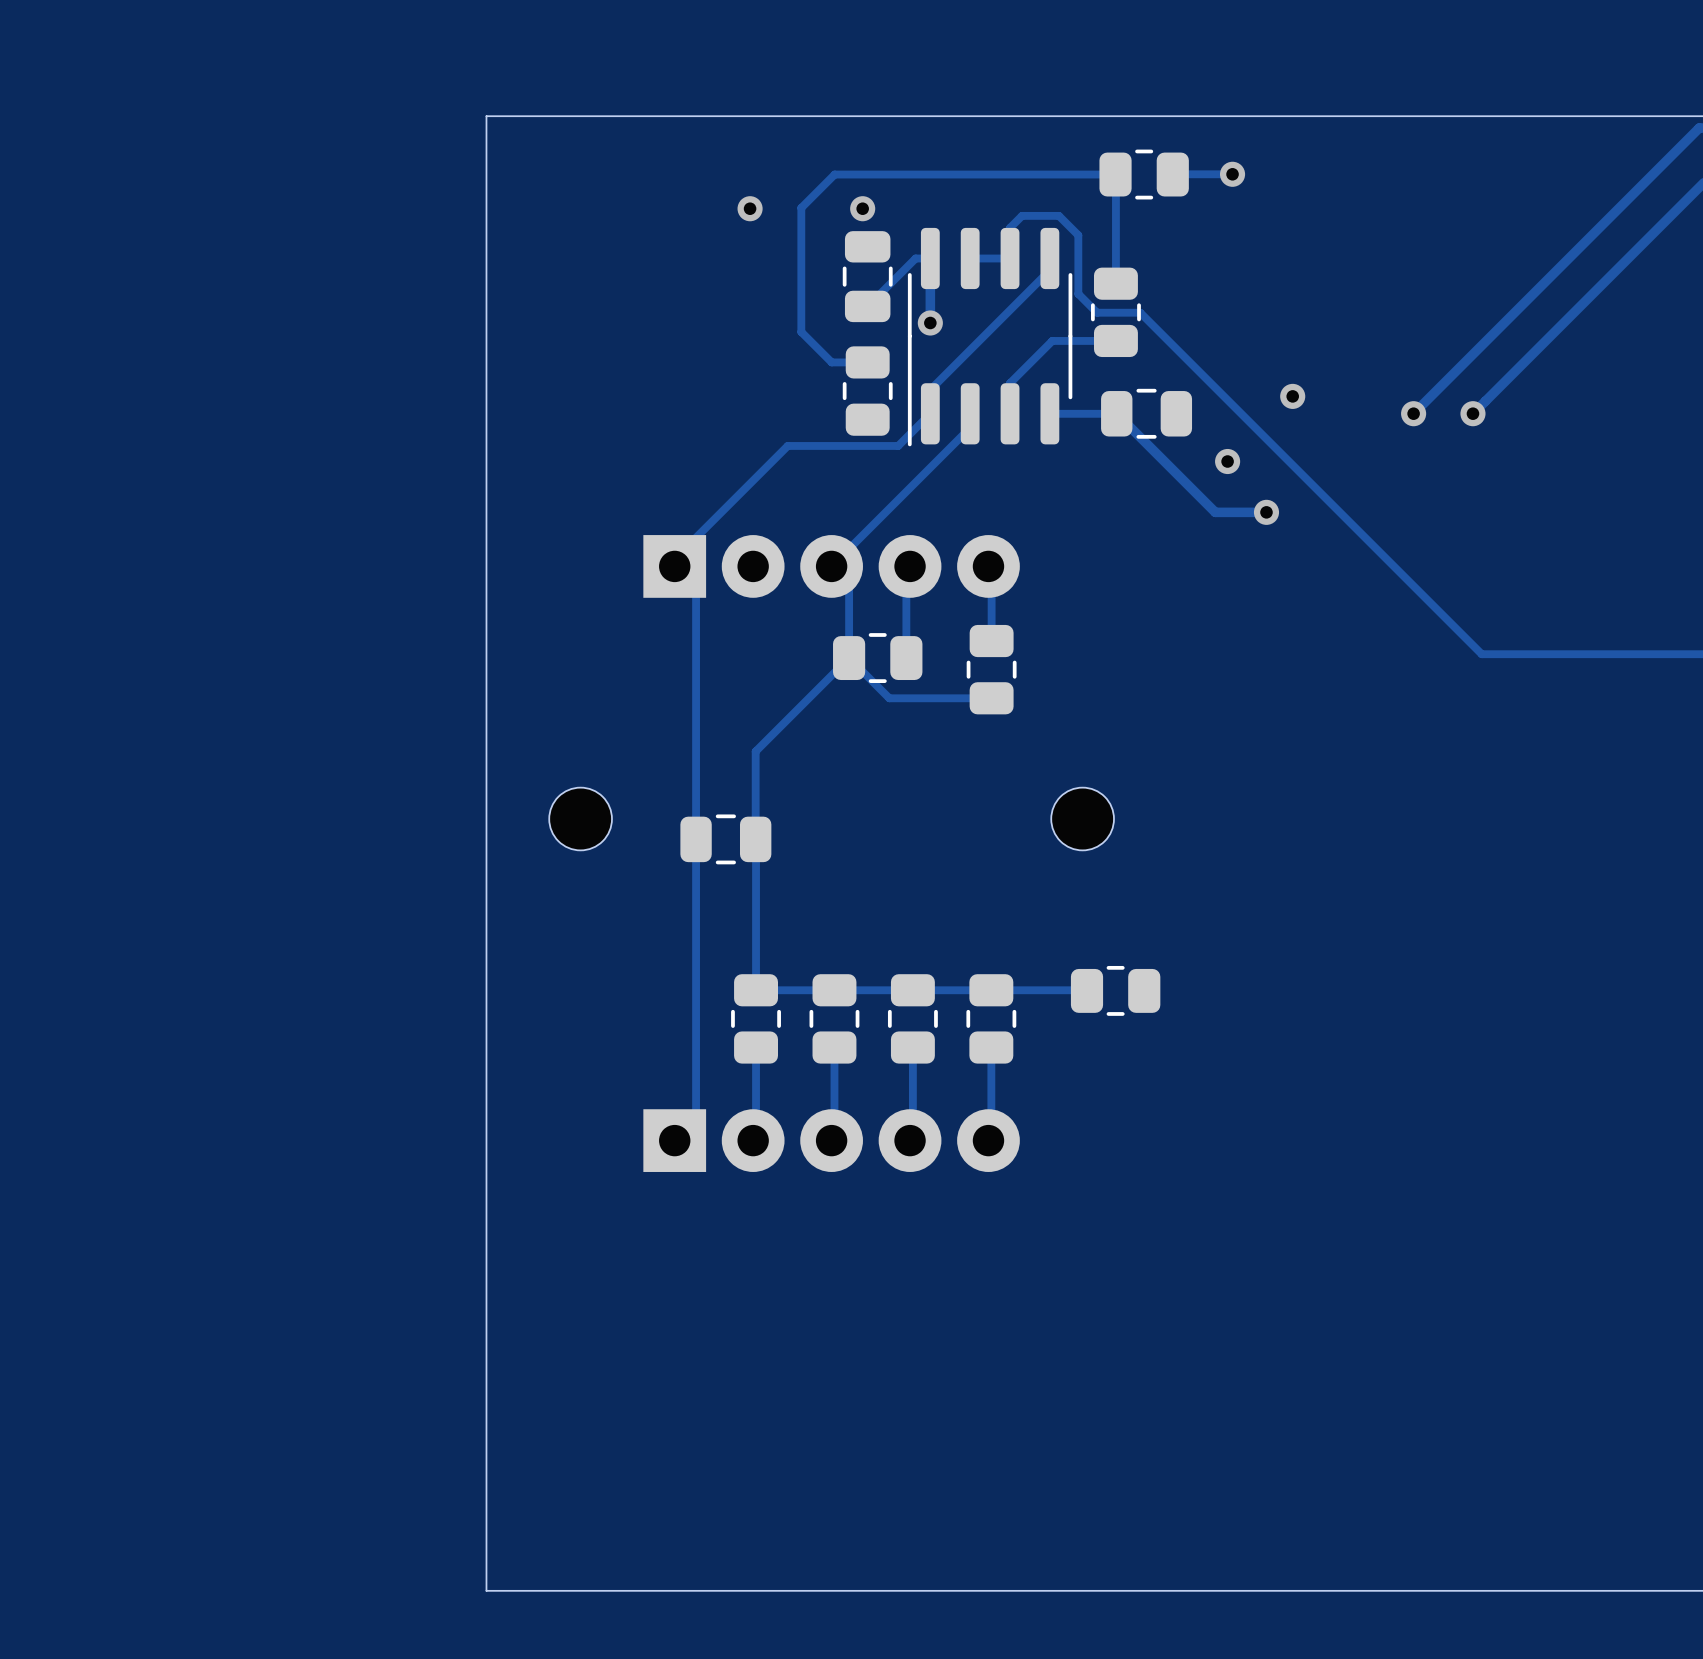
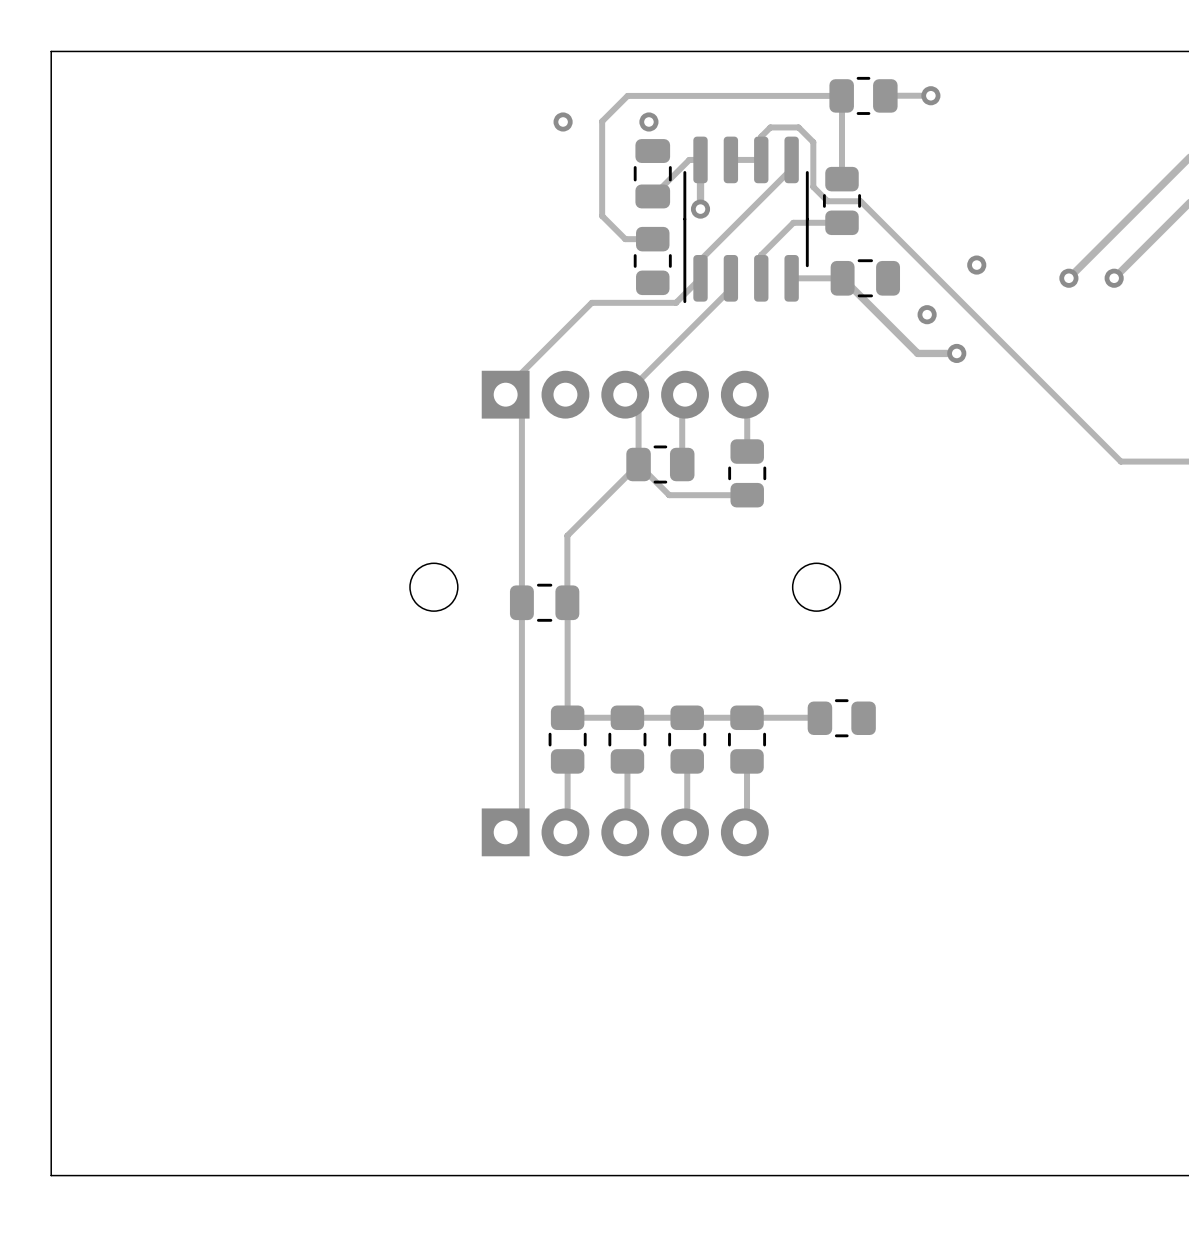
board edge: (486, 116) (486, 1590) -> (362, 51) (51, 51) (51, 1175) (362, 1175)

